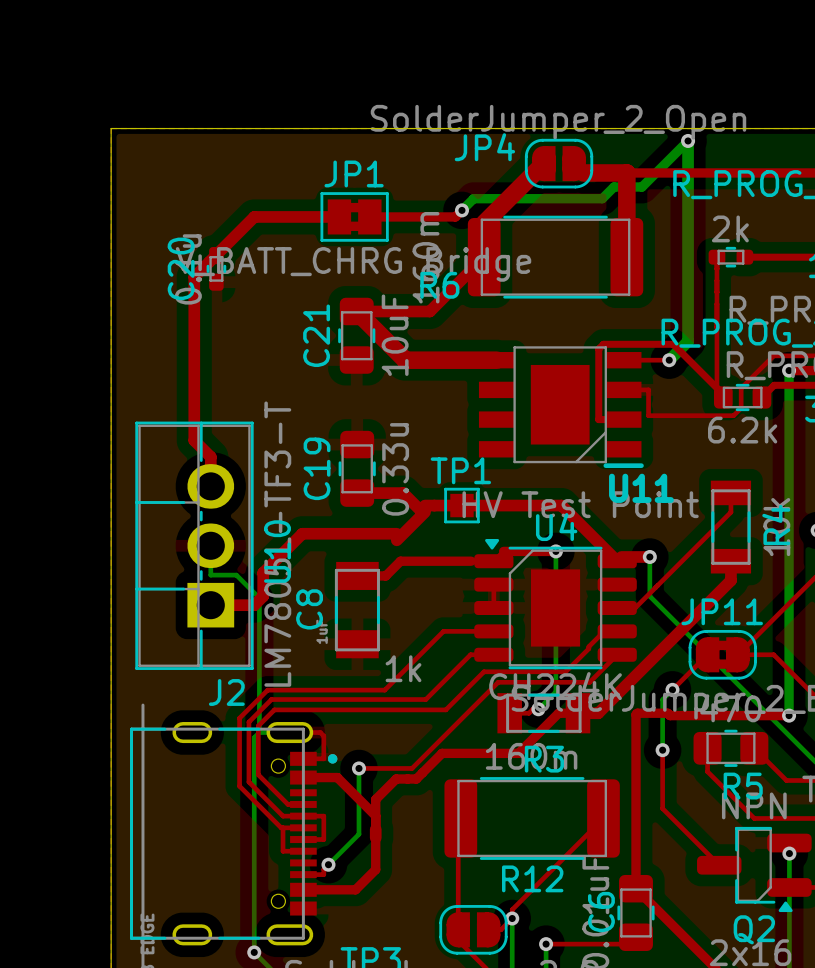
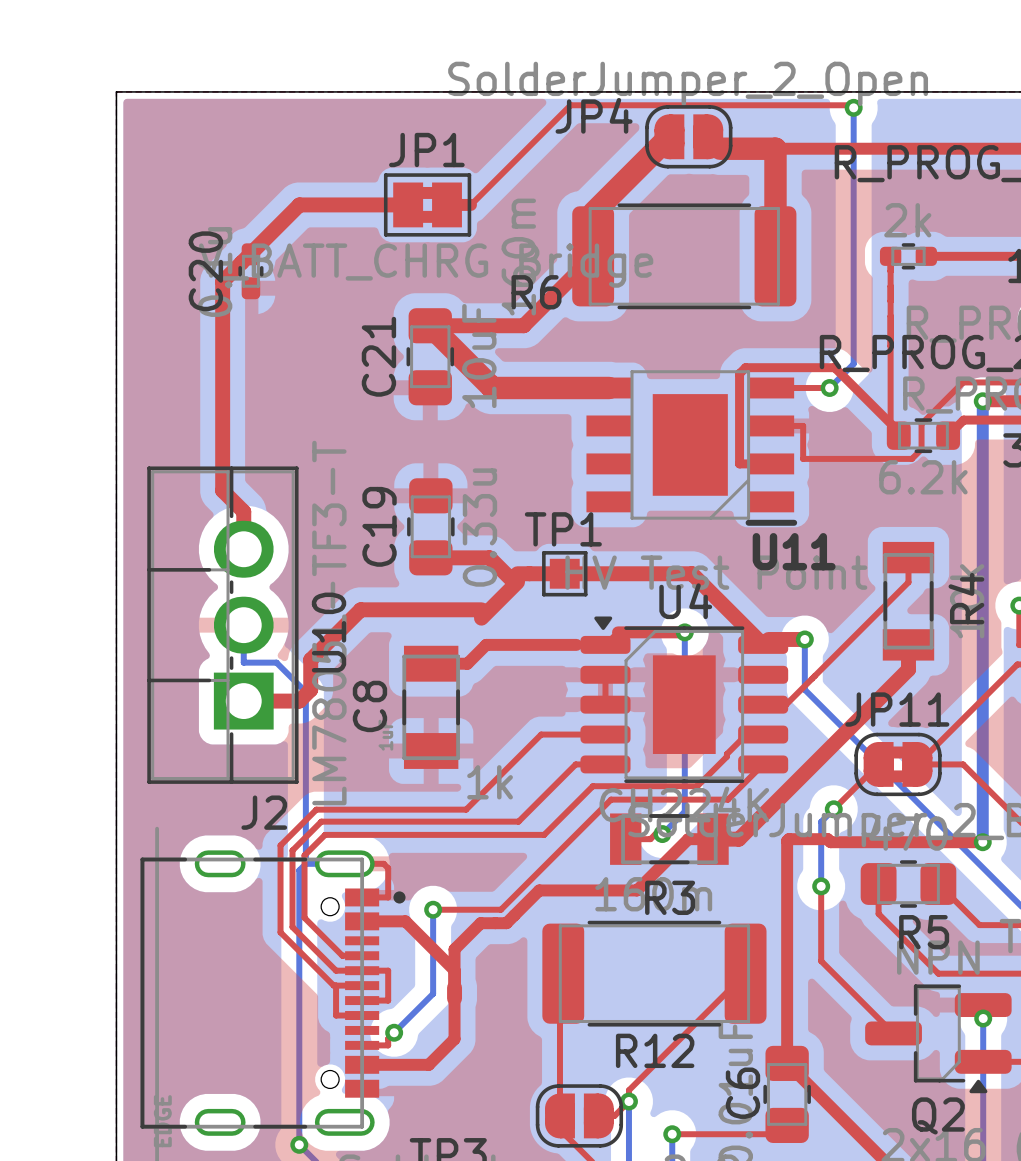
bottom track: (688, 140) (642, 187) (614, 187) (602, 198) (473, 198) (461, 210) -> none
bottom track width: thick (688, 140) (688, 341) (669, 360) -> thin (853, 107) (853, 363) (829, 387)
top track: (461, 210) (455, 216) (388, 216) -> (851, 105) (570, 105) (470, 204)
via: (461, 210) -> none

